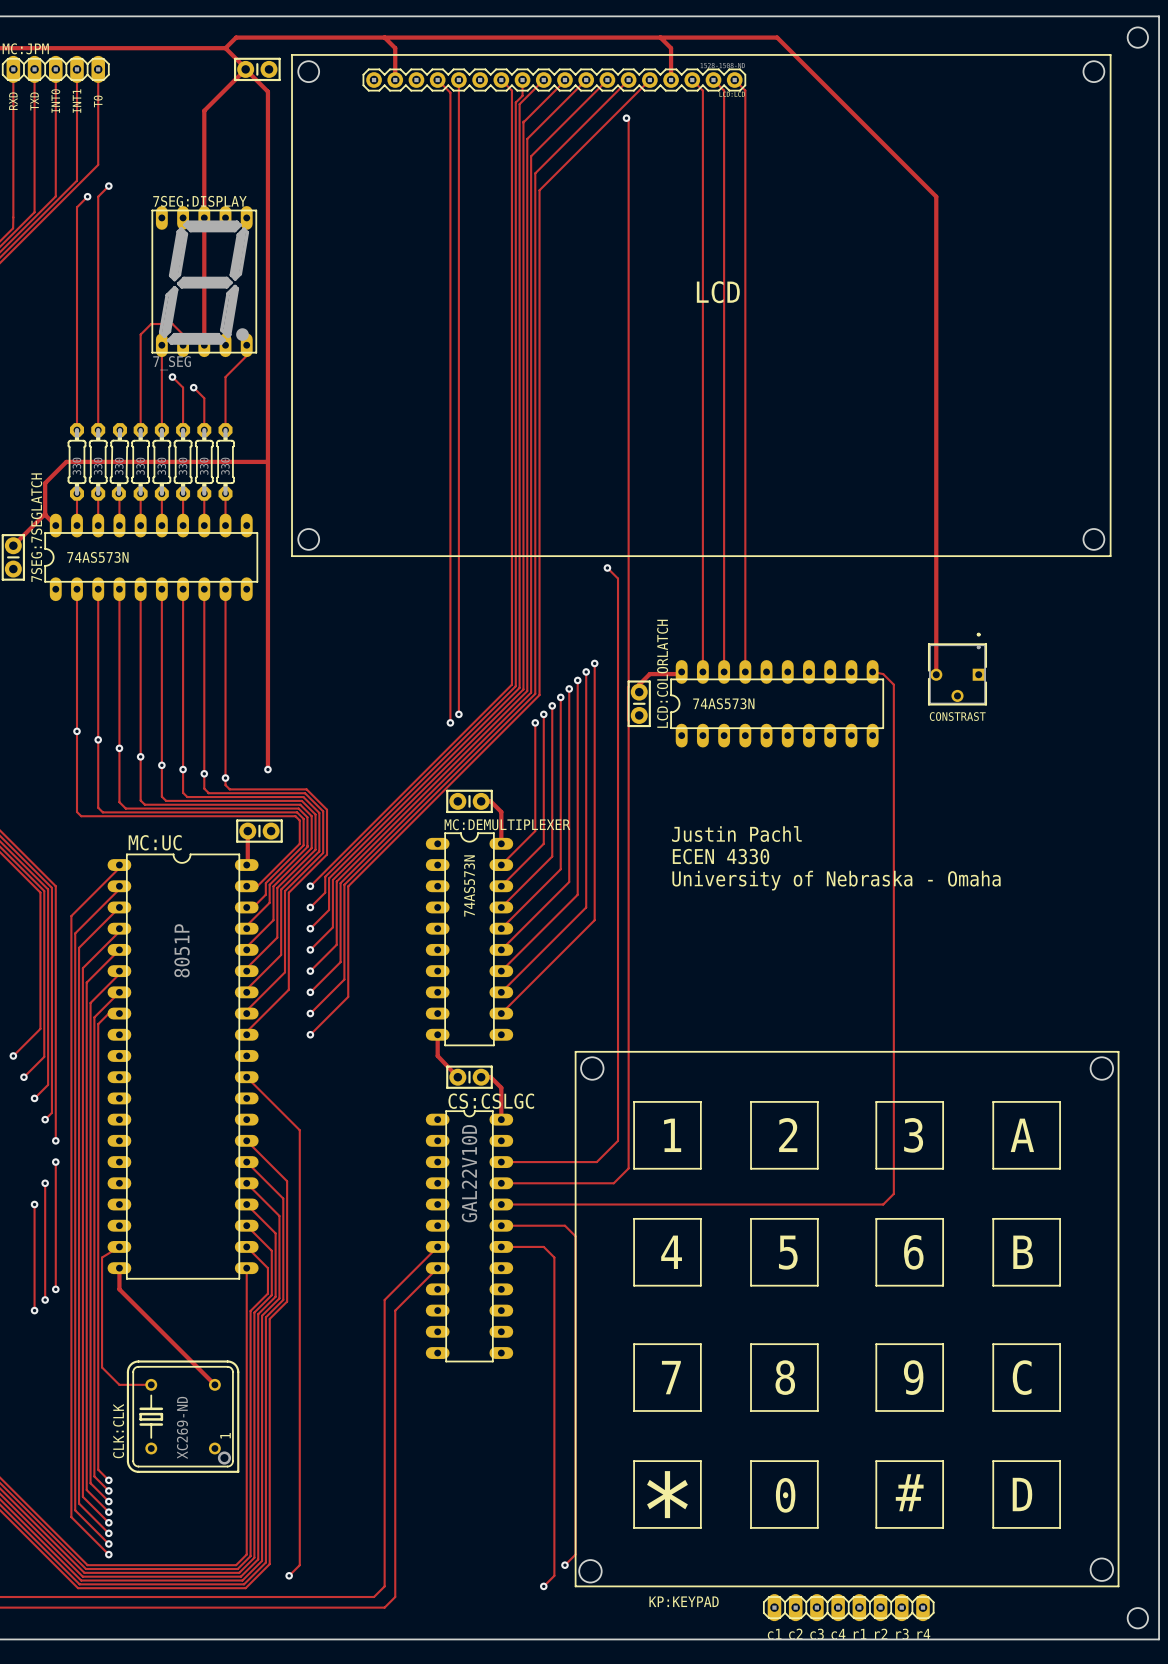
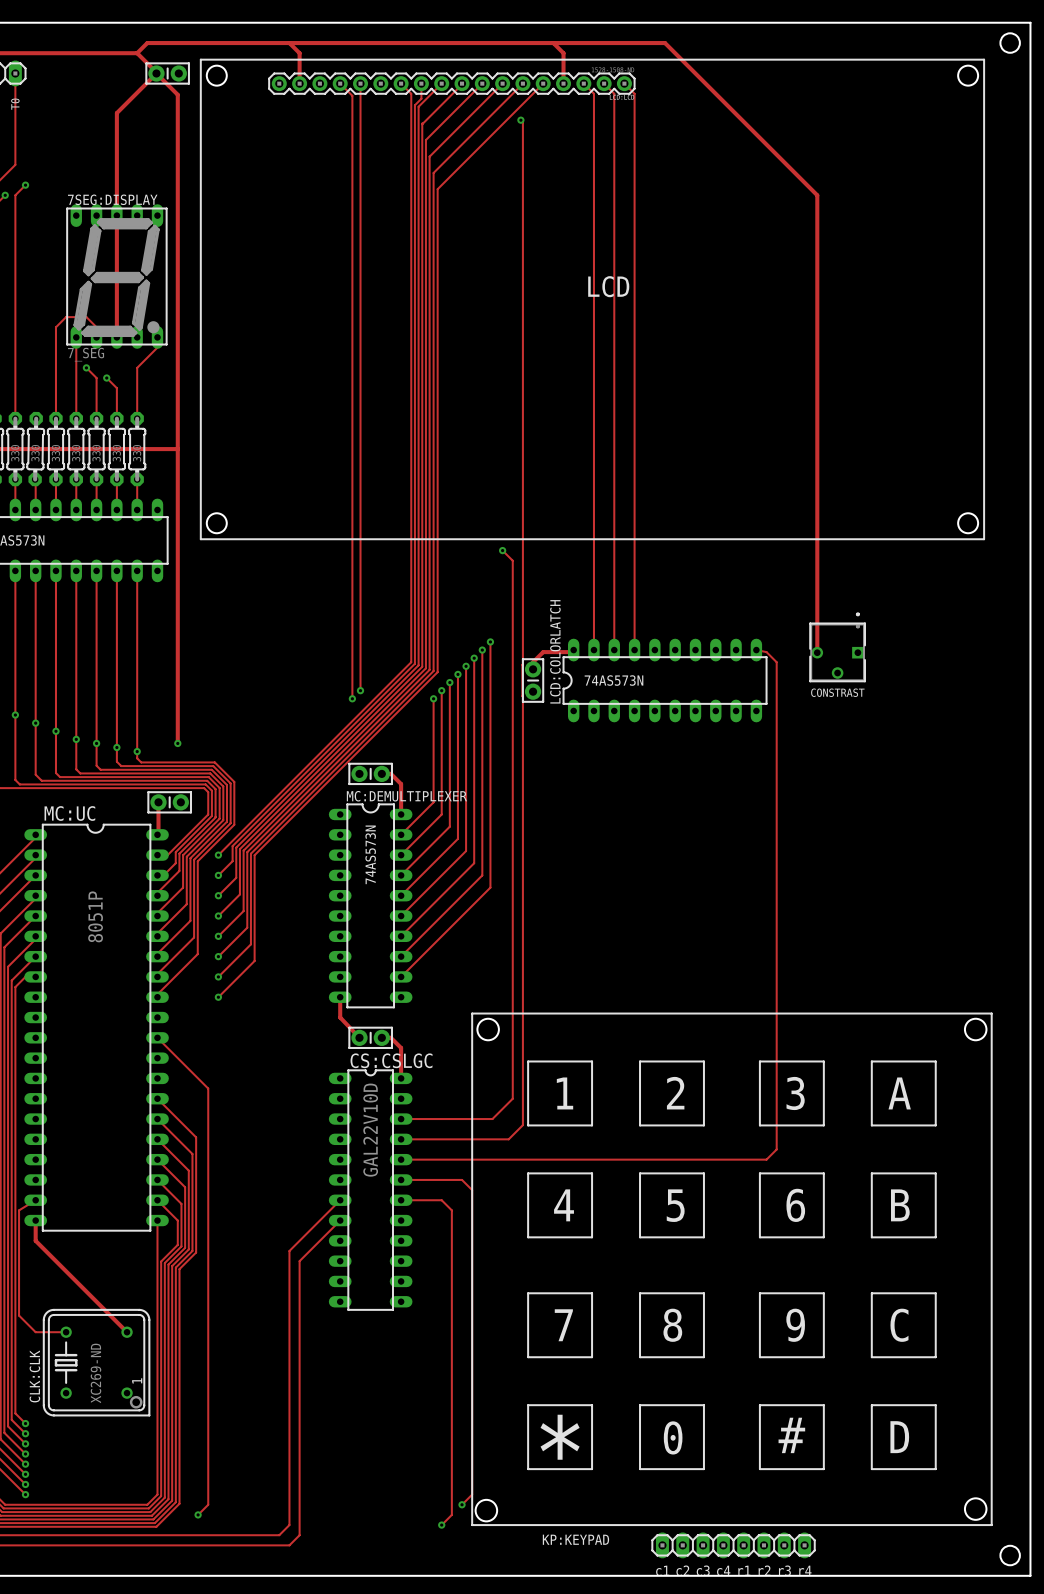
text: Justin Pachl (736, 834) -> none
text: ECEN 4330 (721, 856) -> none
text: University of Nebraska - Omaha (836, 880) -> none

